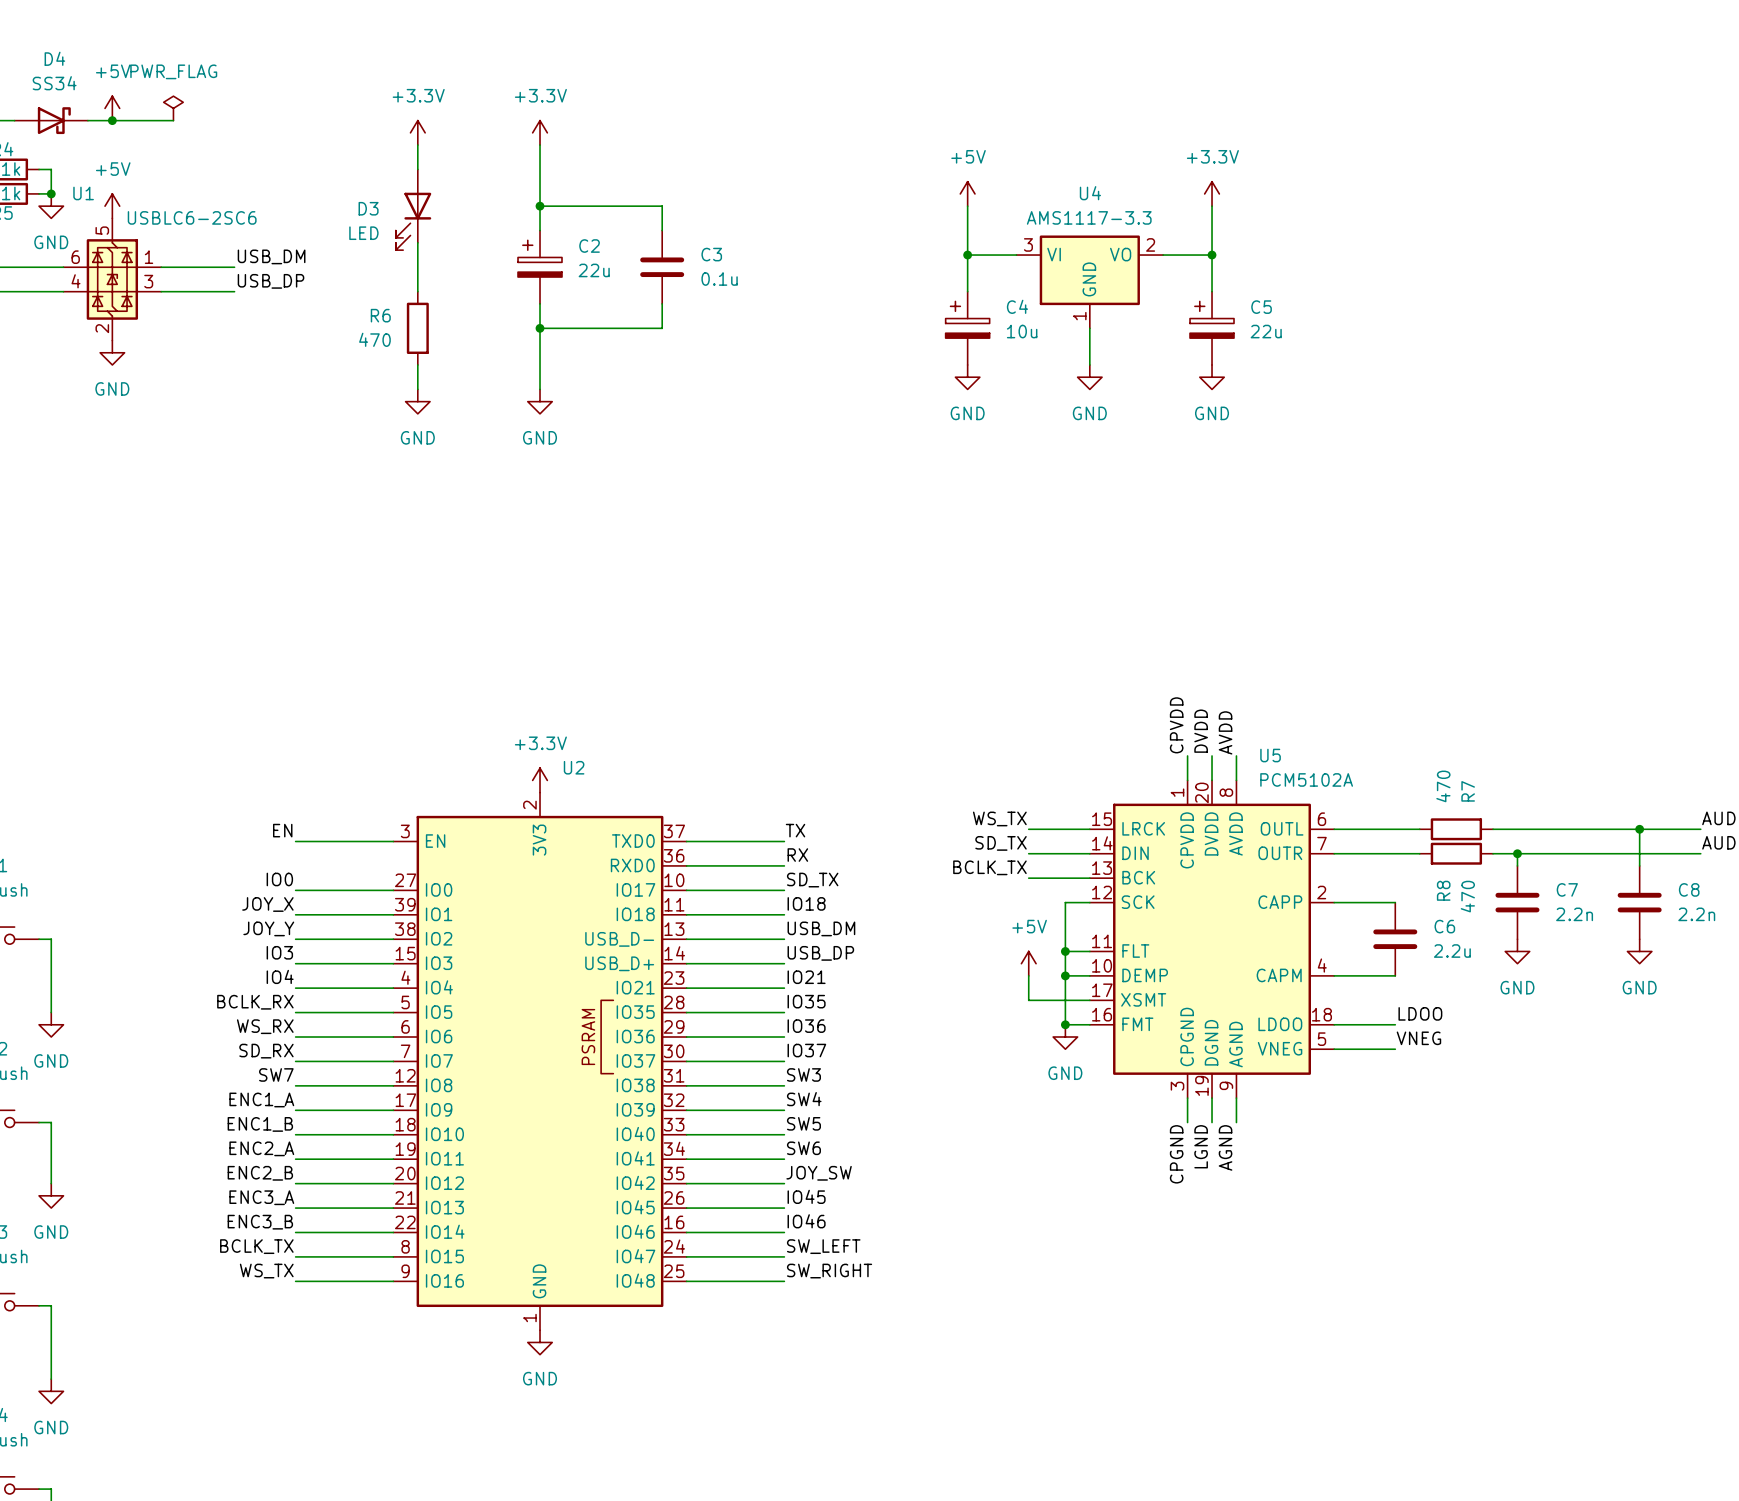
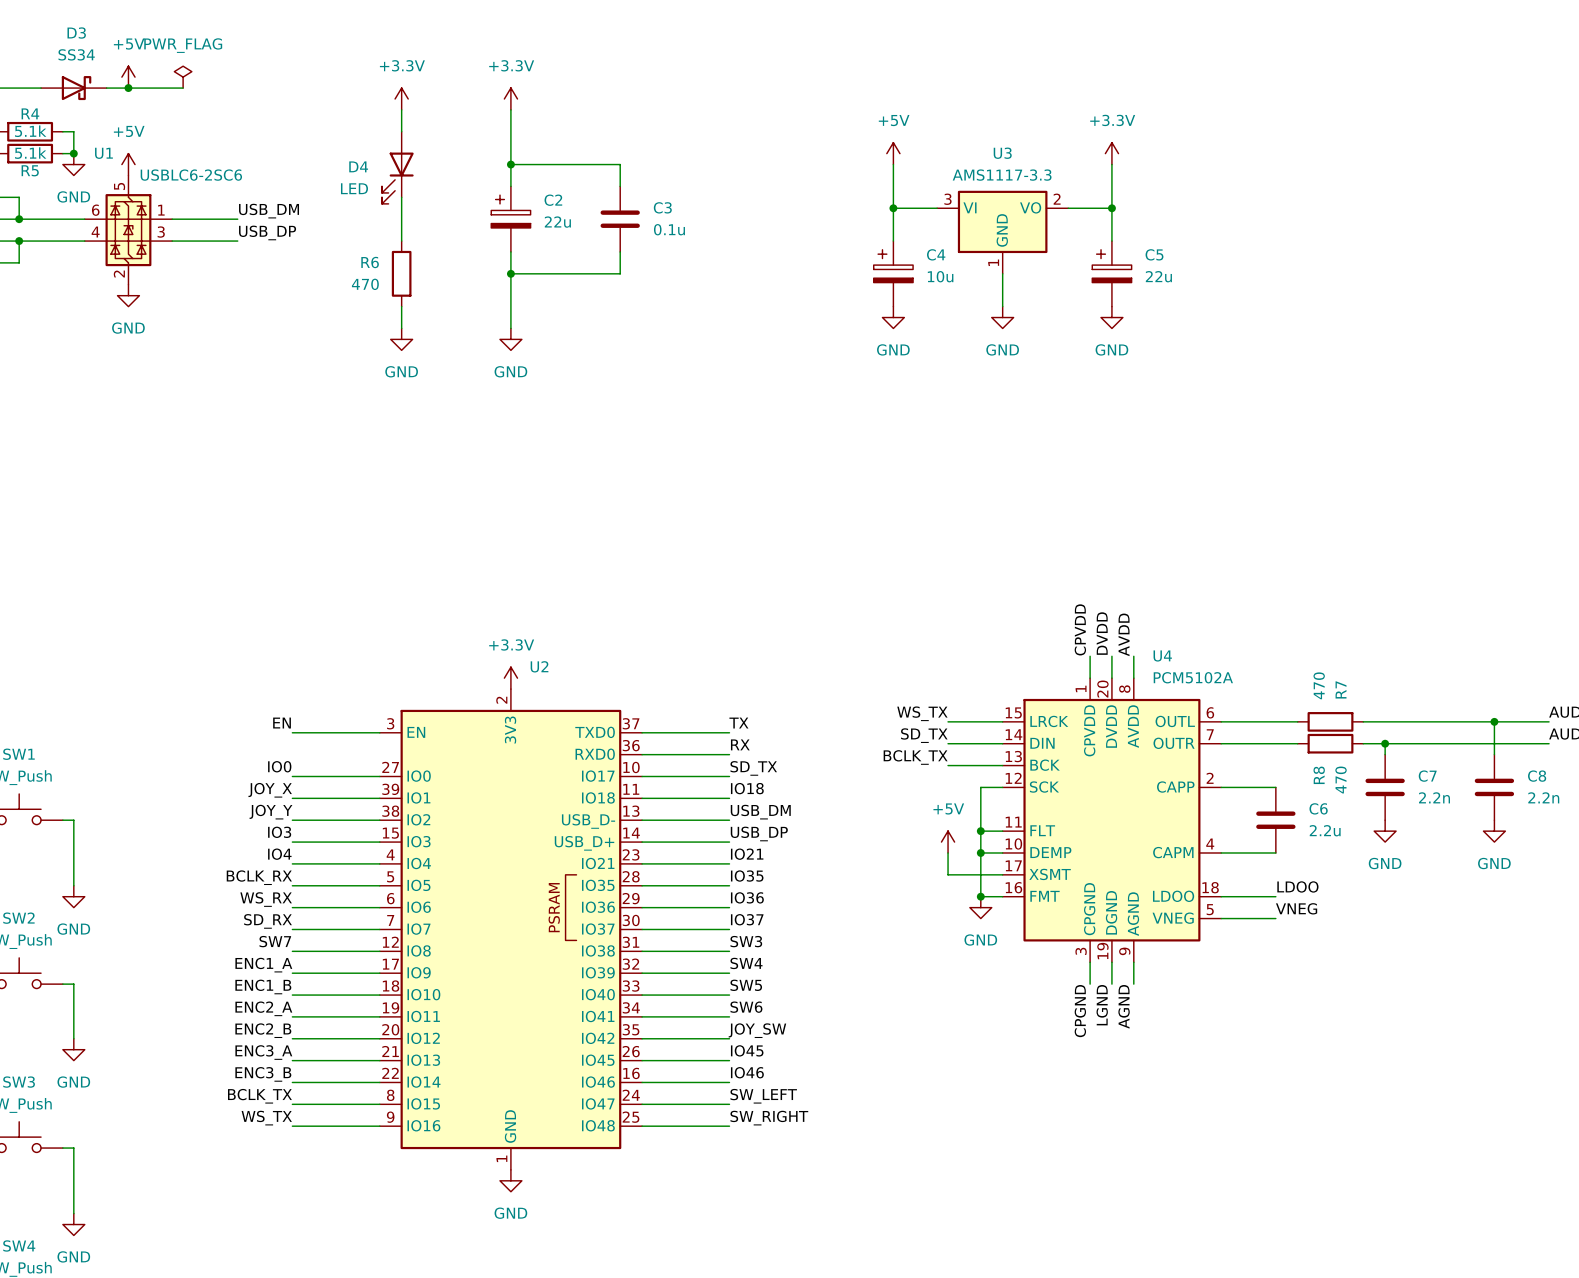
D4 name: D4 (54, 58) -> D3 (76, 33)
U4 name: U4 (1090, 193) -> U3 (1002, 153)
D3 name: D3 (368, 208) -> D4 (358, 166)
U5 name: U5 (1270, 755) -> U4 (1162, 655)

